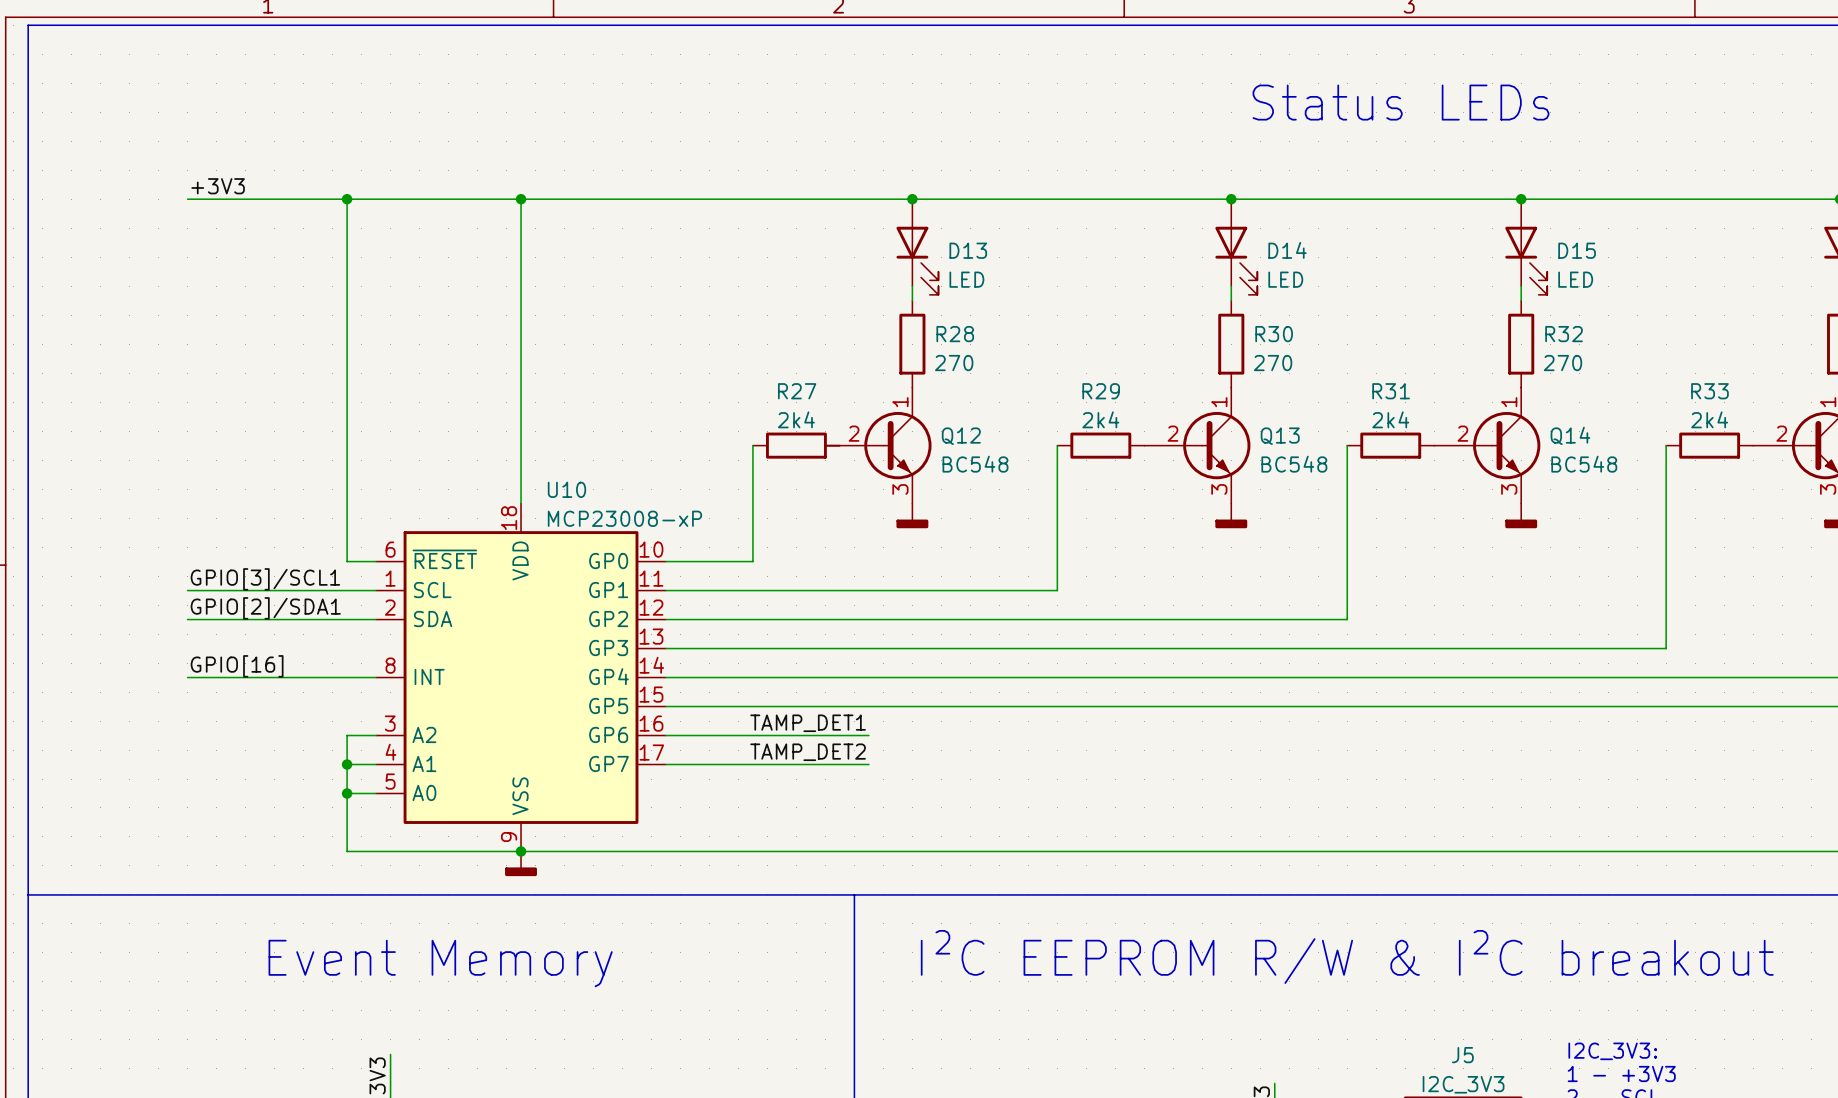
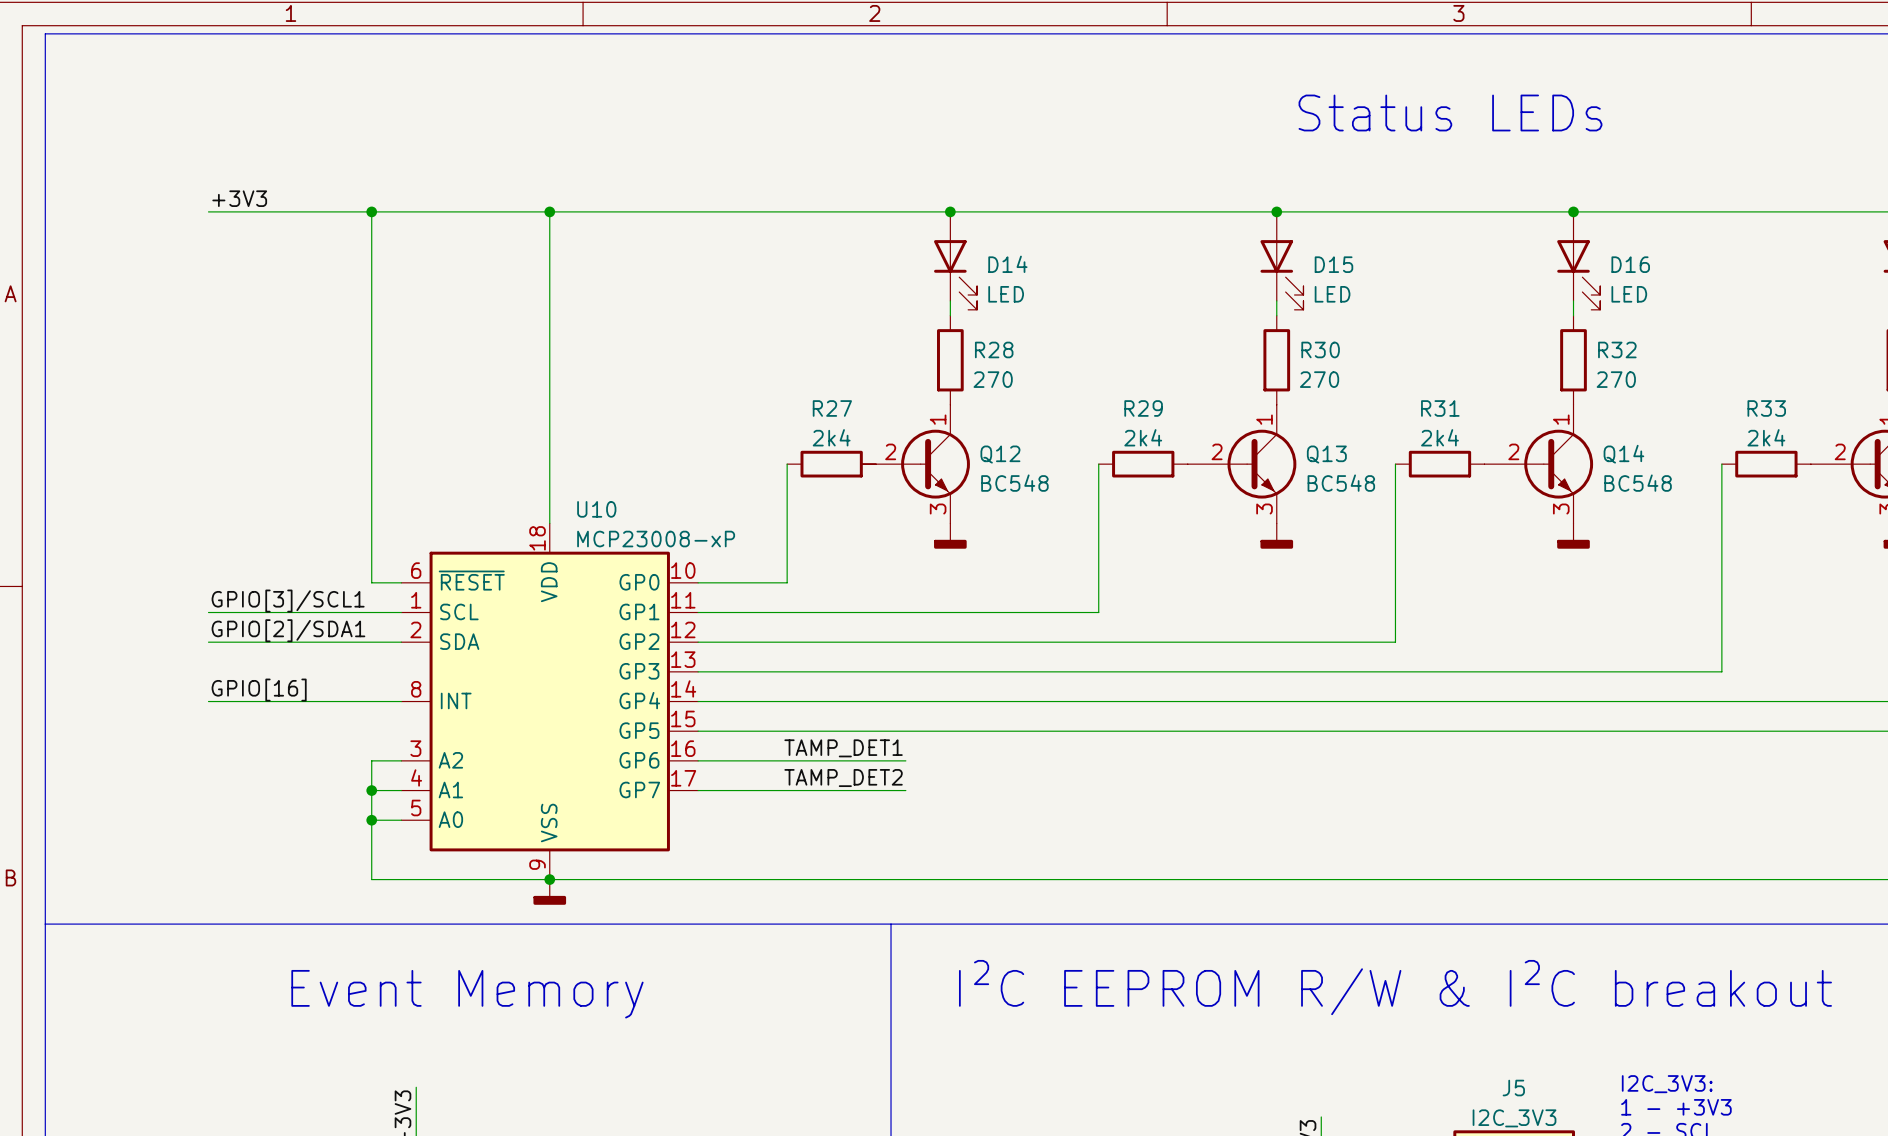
D13 name: D13 (968, 250) -> D14 (1007, 264)
D14 name: D14 (1287, 250) -> D15 (1333, 264)
D15 name: D15 (1577, 250) -> D16 (1630, 264)

